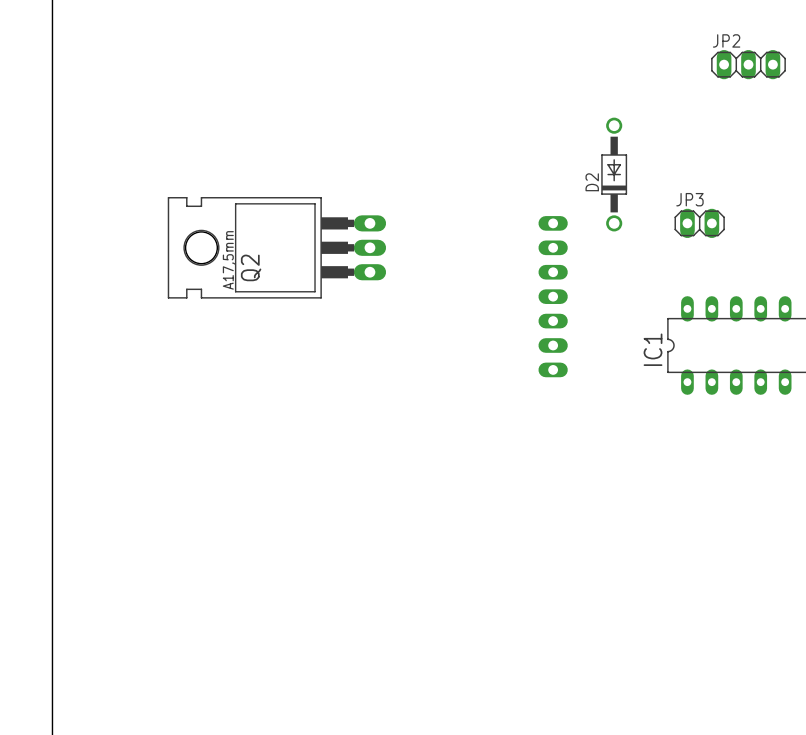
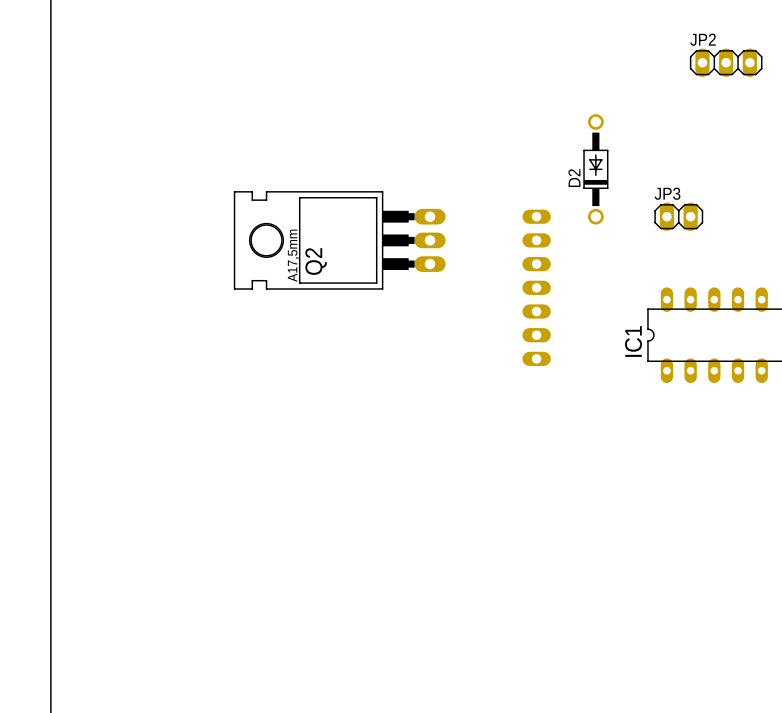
Q2 position: (276, 247) -> (339, 240)

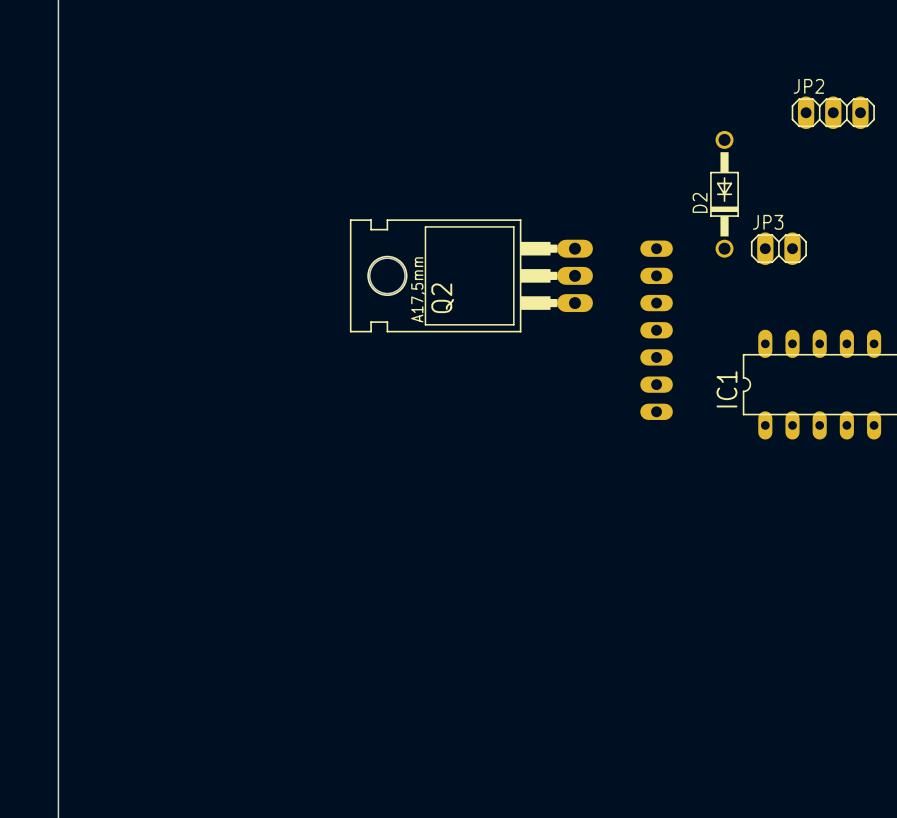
JP2 position: (726, 62) -> (833, 112)
D2 position: (595, 169) -> (724, 194)
Q2 position: (339, 240) -> (471, 275)
part position: (536, 287) -> (656, 330)

